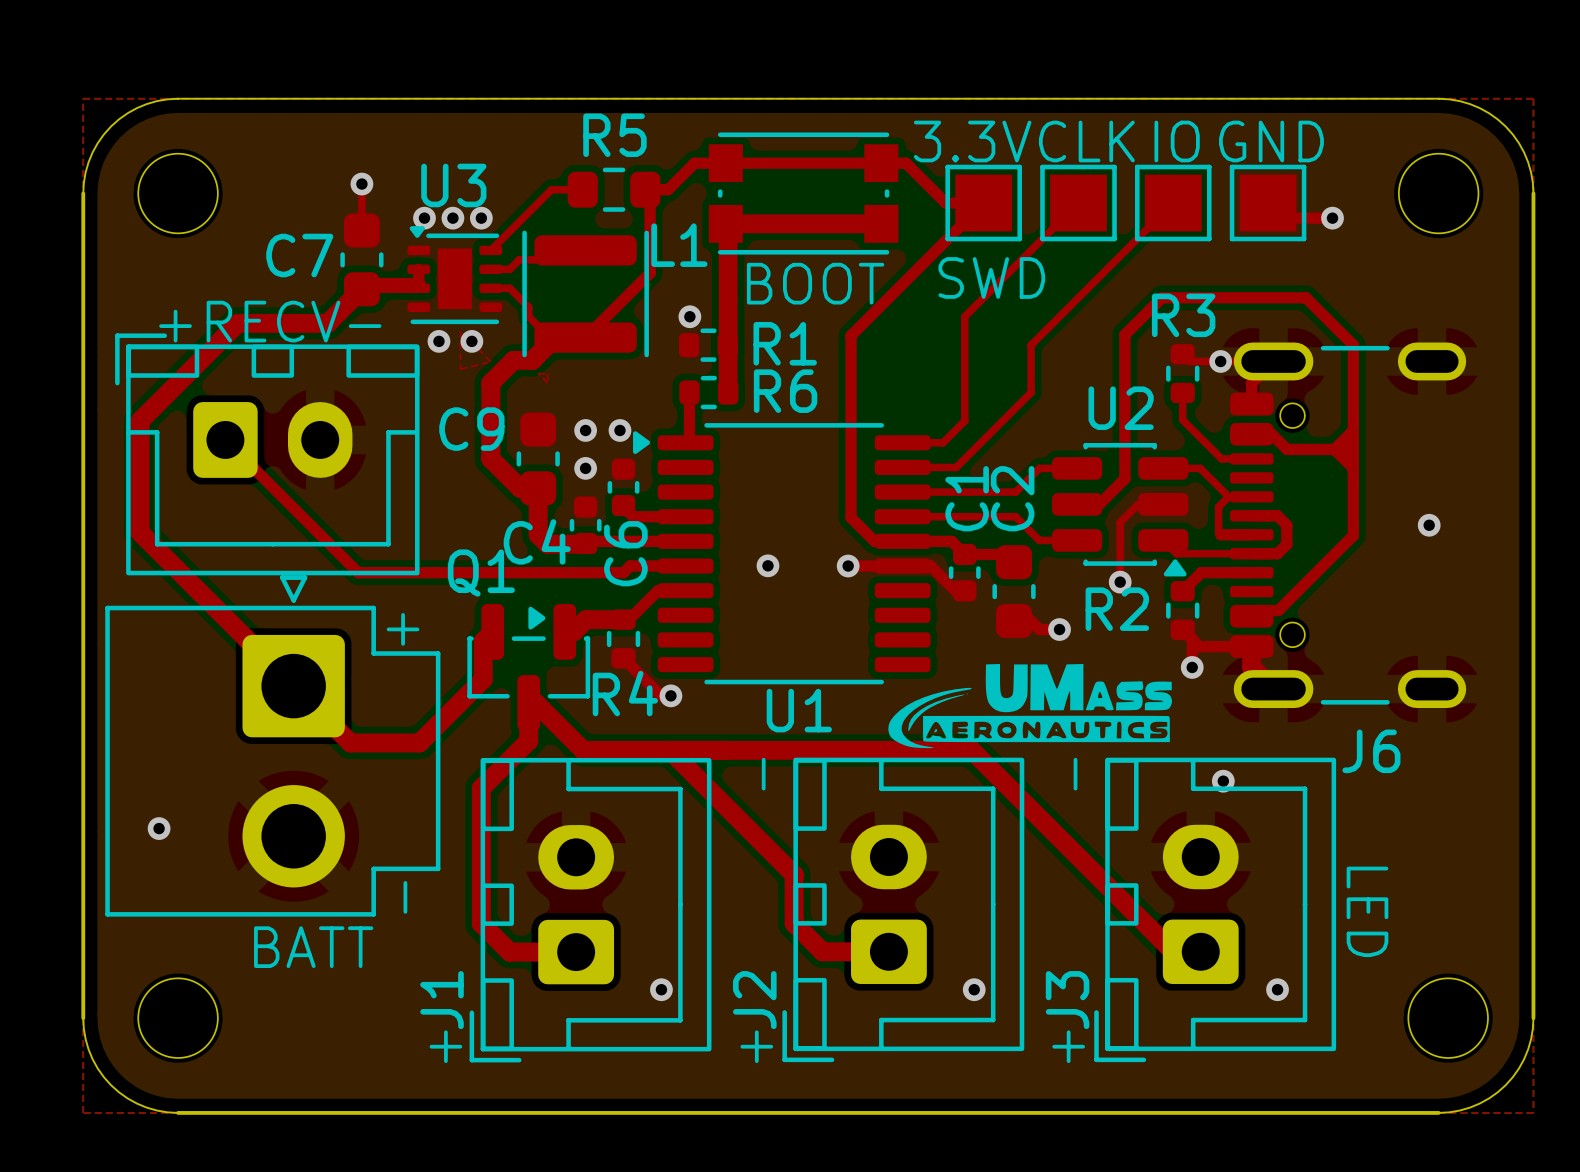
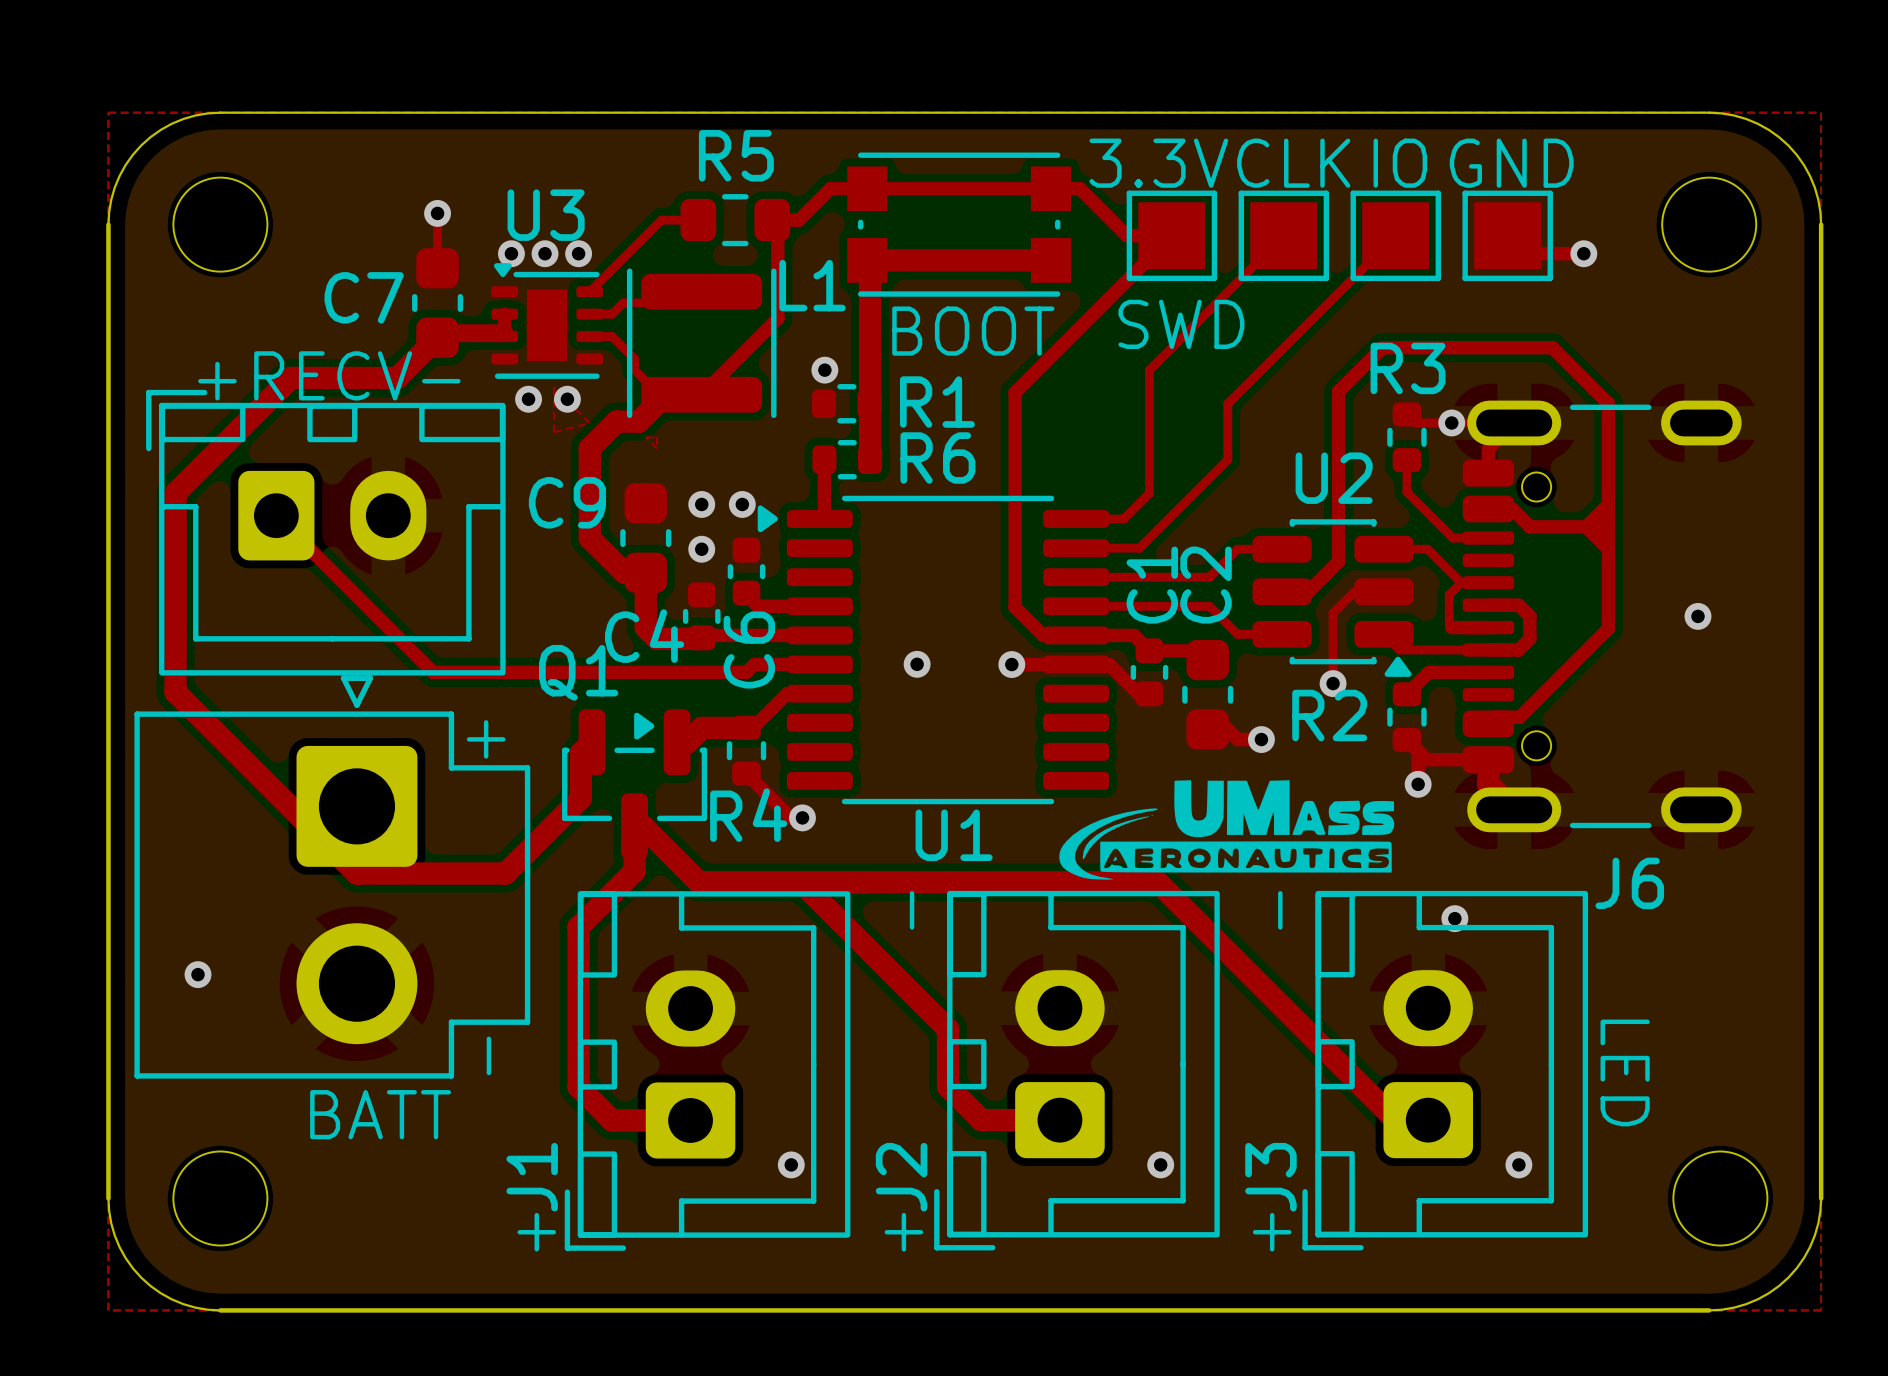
top track: (140, 532) (350, 742) -> (175, 625) (175, 692) (356, 873) (424, 873)

